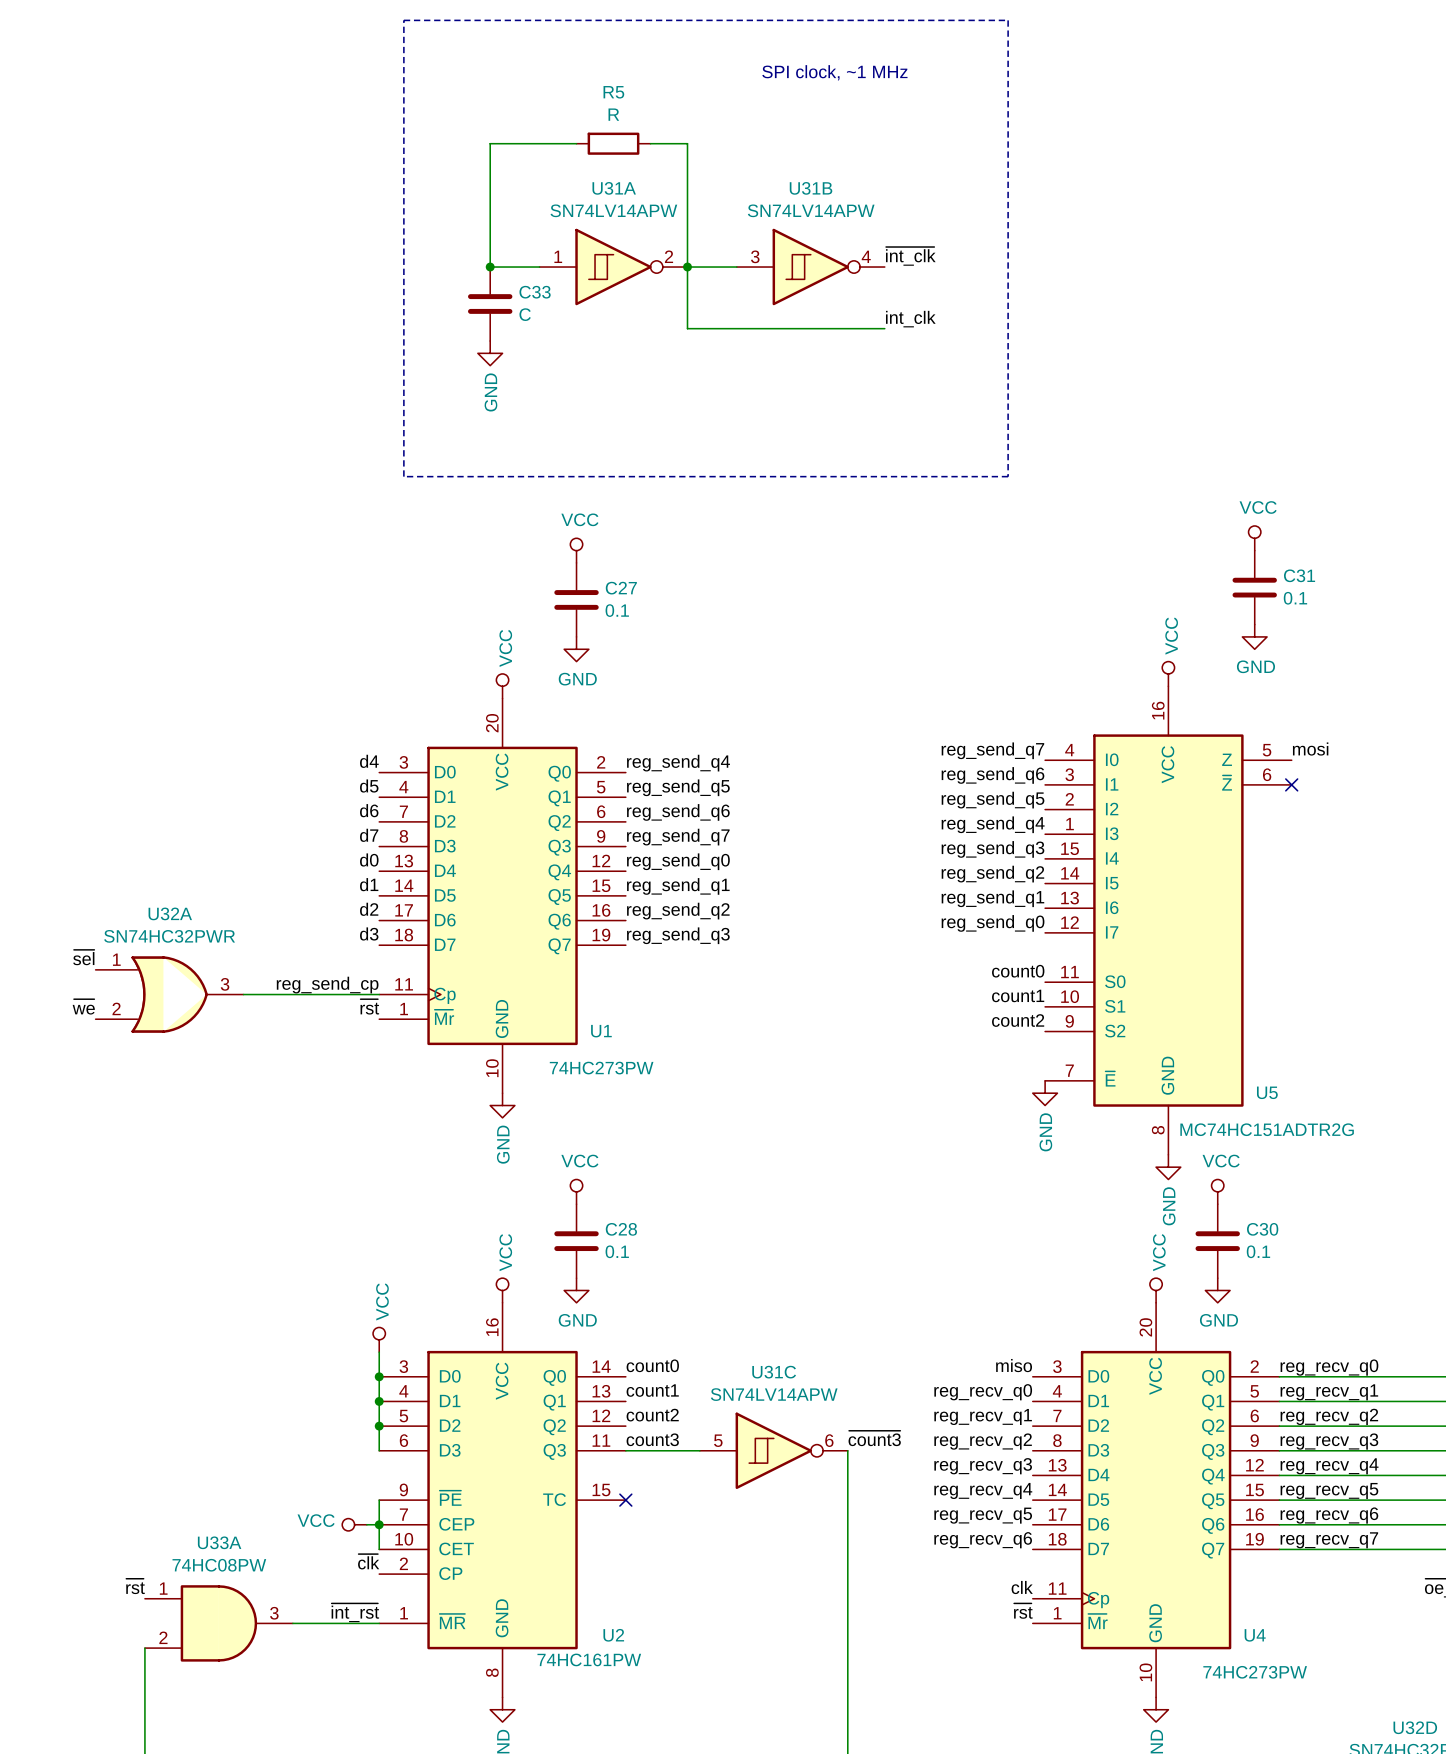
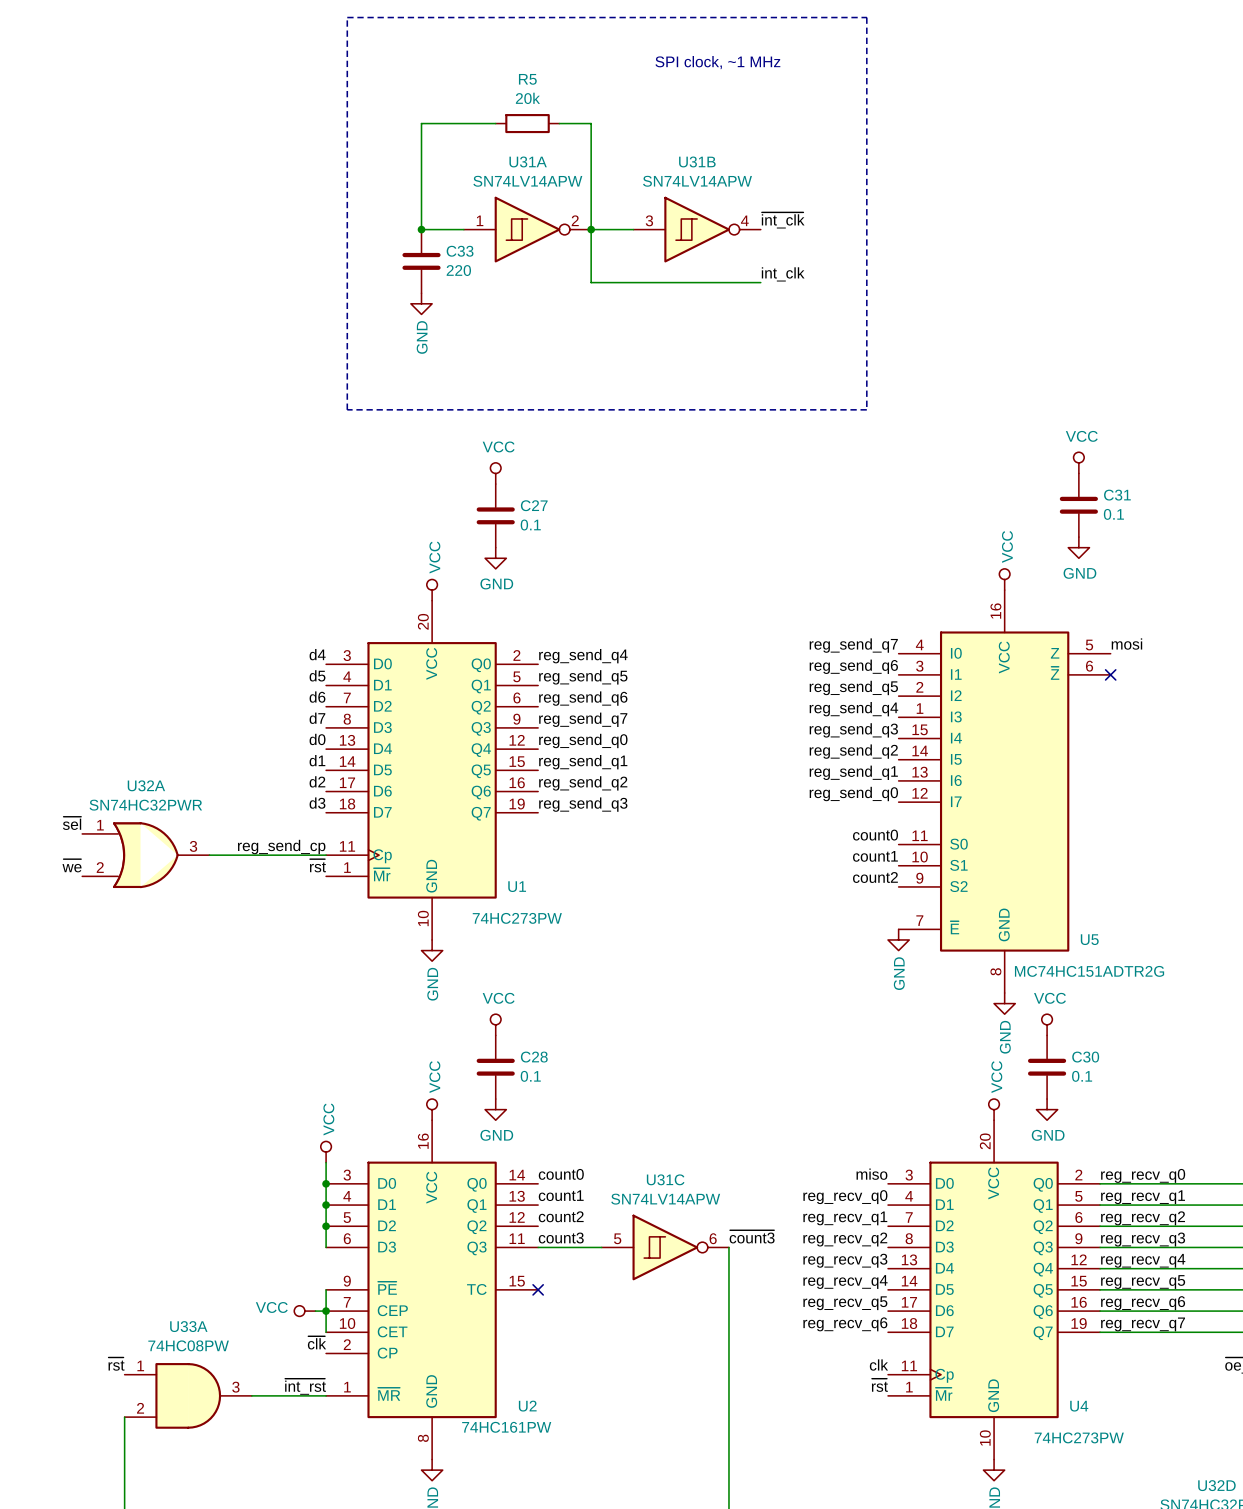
R5 value: R (613, 114) -> 20k (527, 98)
C33 value: C (525, 314) -> 220 (458, 270)

